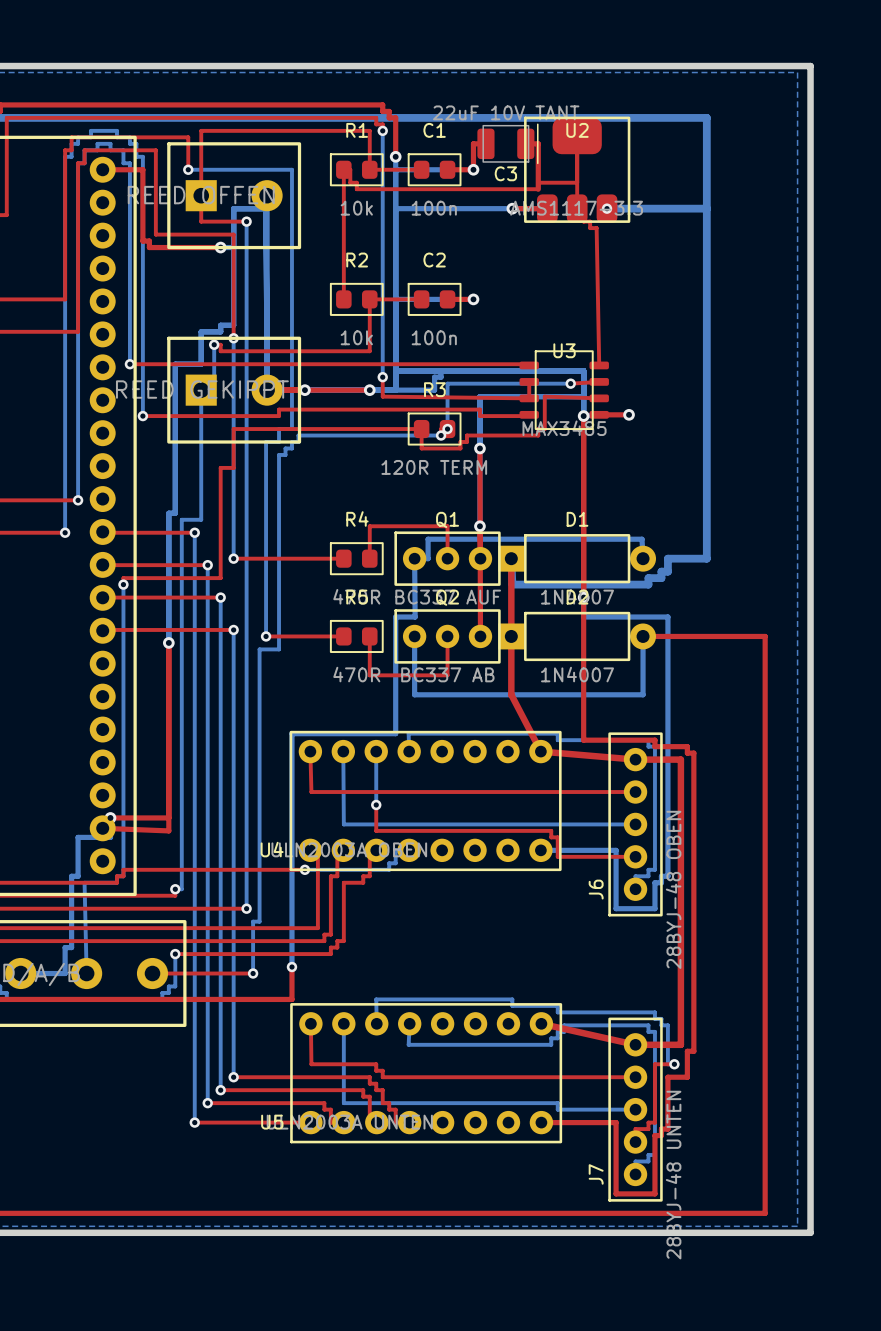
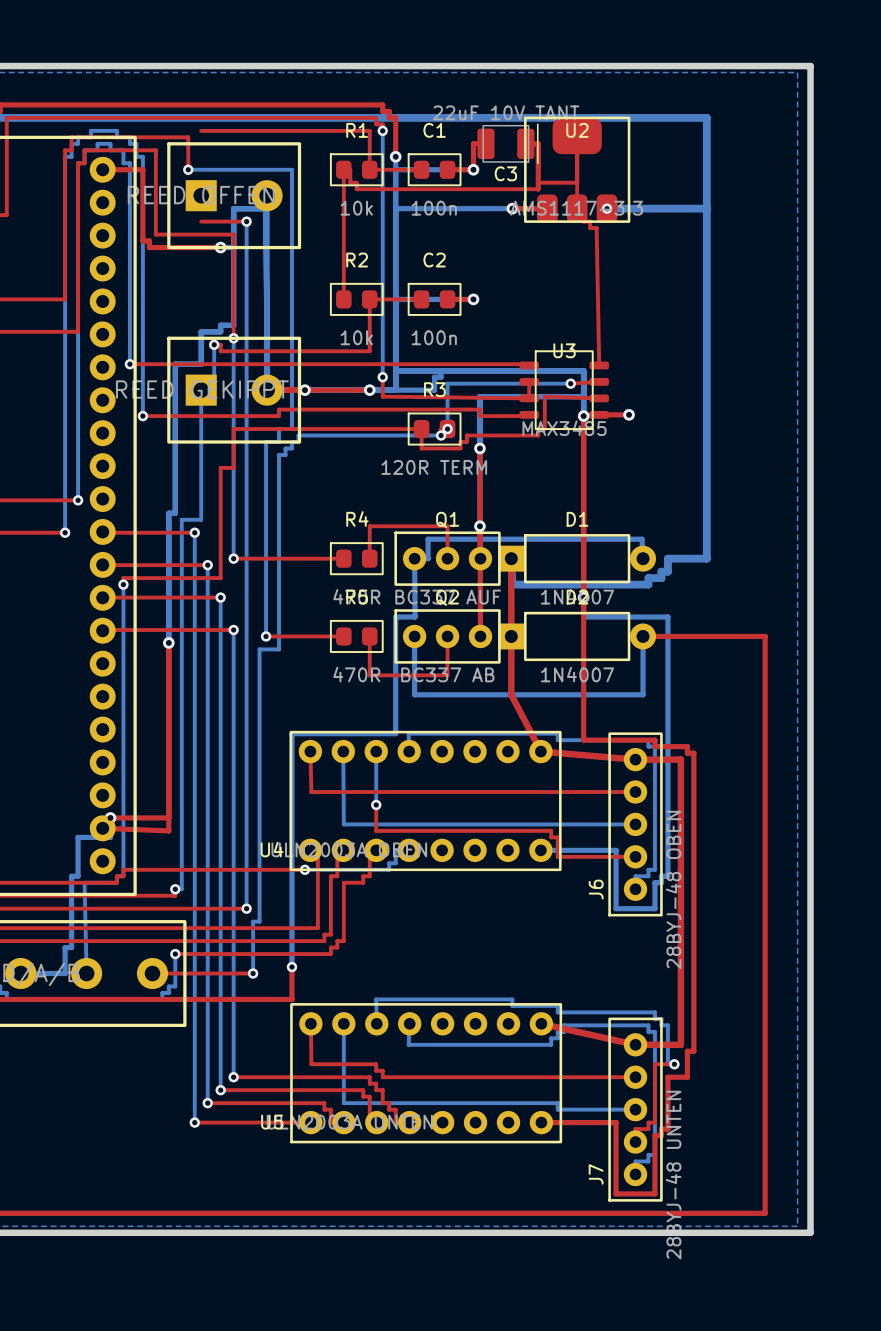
top track: (201, 130) (201, 221) -> none

